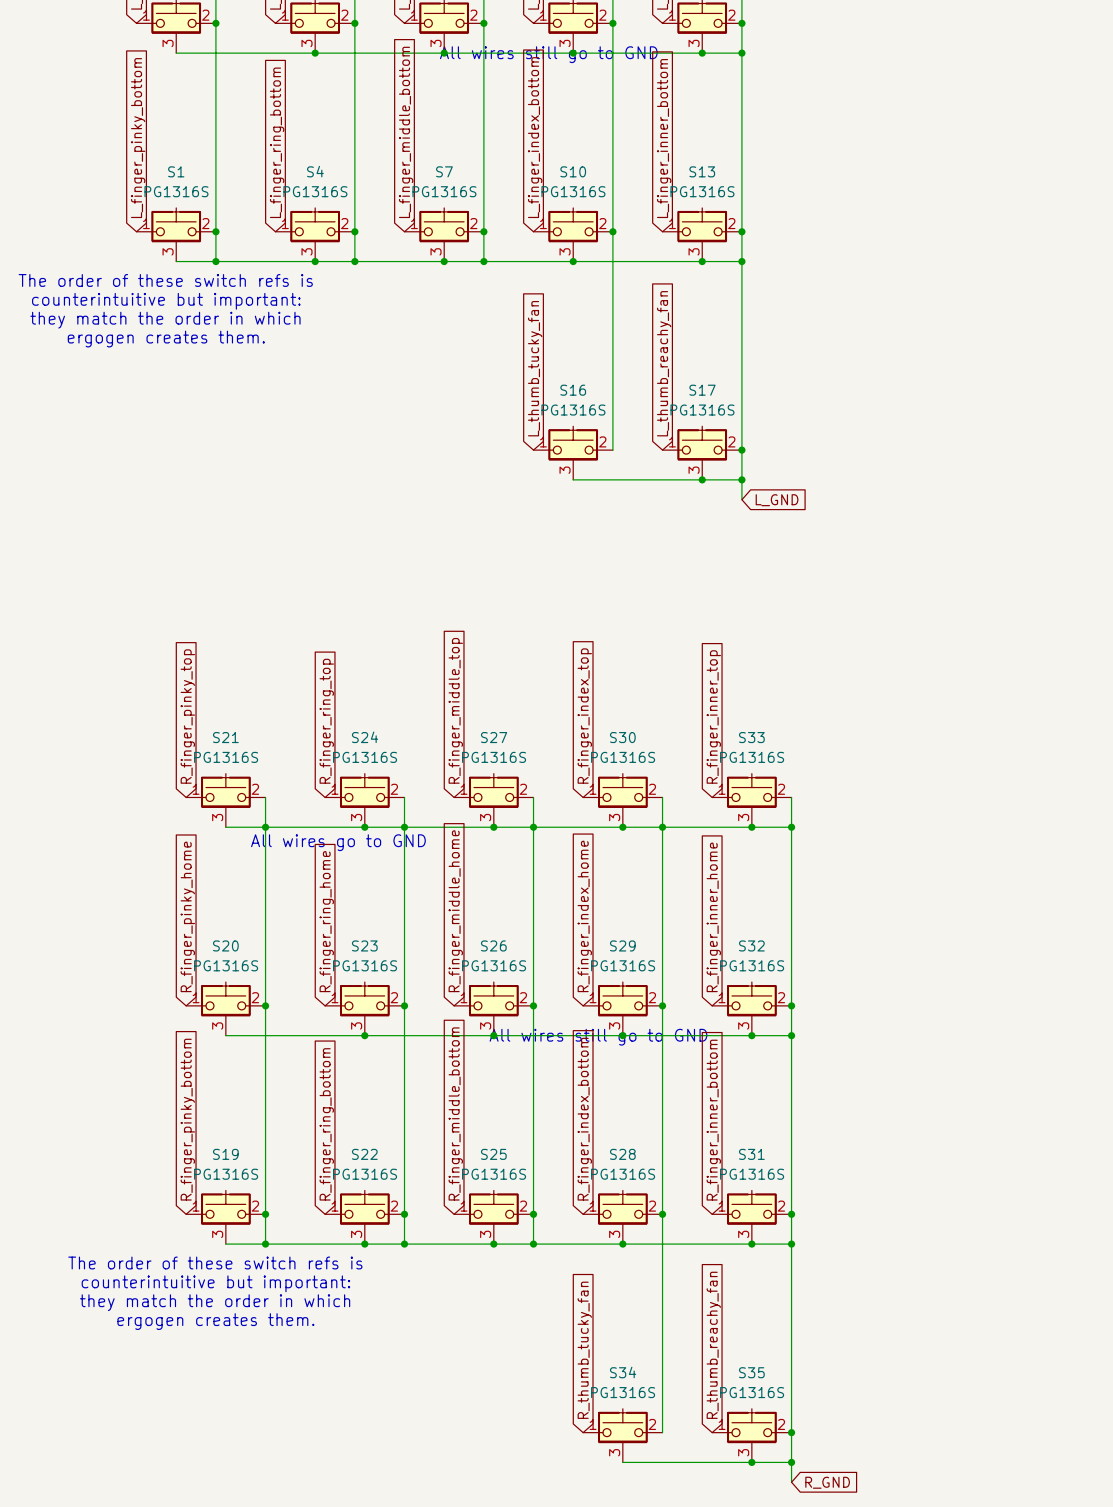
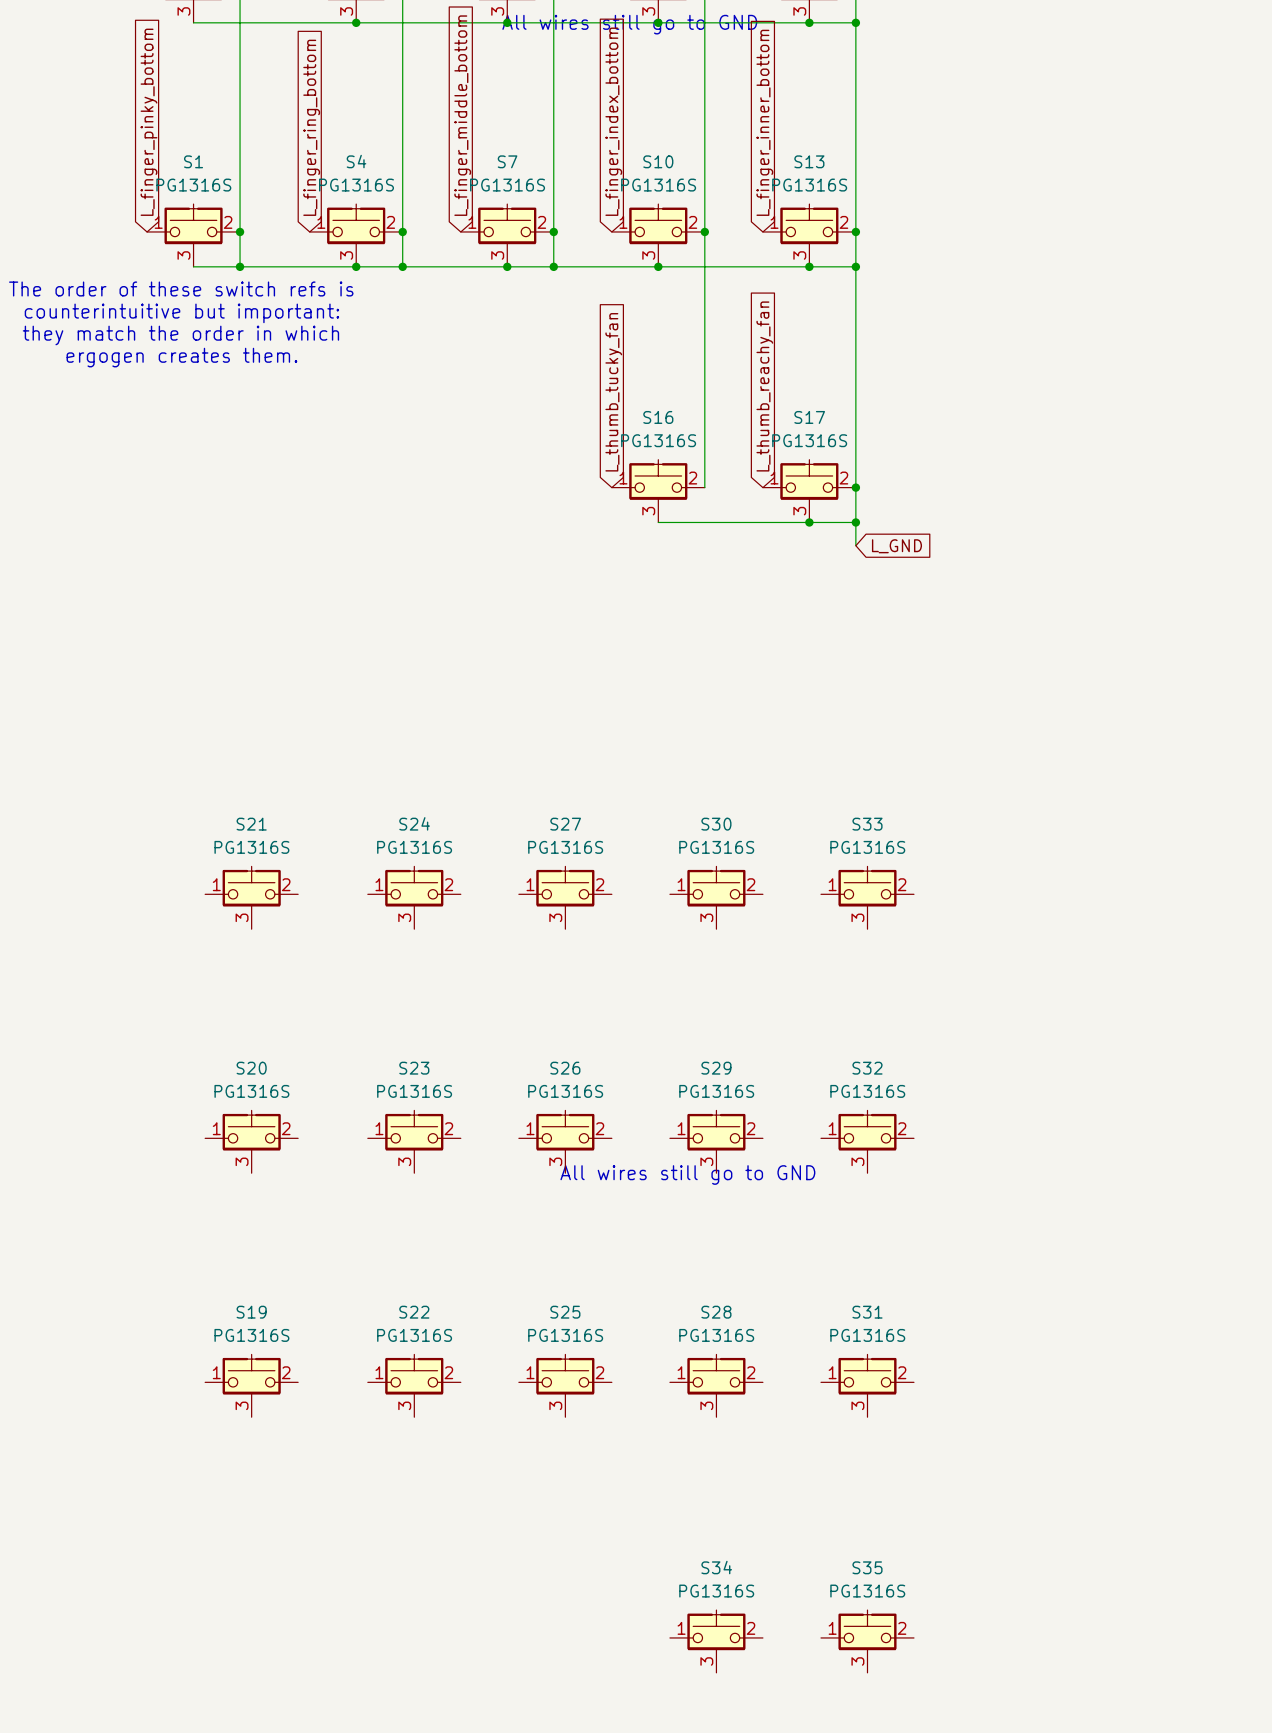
global label: R_finger_middle_top (455, 710) -> none
global label: R_finger_pinky_top (187, 716) -> none
global label: R_finger_index_top (584, 716) -> none
global label: R_finger_inner_top (713, 716) -> none
global label: R_finger_ring_top (326, 721) -> none
wire: (265, 797) (265, 1244) -> none
wire: (404, 797) (404, 1244) -> none
wire: (533, 797) (533, 1244) -> none
wire: (662, 797) (662, 1432) -> none
wire: (791, 797) (791, 1482) -> none
wire: (225, 827) (791, 827) -> none
junction: (265, 827) -> none
junction: (364, 827) -> none
junction: (404, 827) -> none
junction: (493, 827) -> none
junction: (533, 827) -> none
junction: (622, 827) -> none
junction: (662, 827) -> none
junction: (751, 827) -> none
junction: (791, 827) -> none
text: All wires go to GND (338, 842) -> none
global label: R_finger_middle_home (455, 911) -> none
global label: R_finger_pinky_home (187, 916) -> none
global label: R_finger_index_home (584, 916) -> none
global label: R_finger_inner_home (713, 917) -> none
global label: R_finger_ring_home (326, 921) -> none
junction: (265, 1005) -> none
junction: (404, 1005) -> none
junction: (533, 1005) -> none
junction: (662, 1005) -> none
junction: (791, 1005) -> none
wire: (225, 1035) (791, 1035) -> none
junction: (364, 1035) -> none
junction: (493, 1035) -> none
junction: (622, 1035) -> none
junction: (751, 1035) -> none
junction: (791, 1035) -> none
global label: R_finger_middle_bottom (455, 1113) -> none
global label: R_finger_pinky_bottom (187, 1119) -> none
global label: R_finger_index_bottom (584, 1119) -> none
global label: R_finger_inner_bottom (713, 1120) -> none
global label: R_finger_ring_bottom (326, 1124) -> none
junction: (265, 1214) -> none
junction: (404, 1214) -> none
junction: (533, 1214) -> none
junction: (662, 1214) -> none
junction: (791, 1214) -> none
wire: (225, 1244) (791, 1244) -> none
junction: (265, 1244) -> none
junction: (364, 1244) -> none
junction: (404, 1244) -> none
junction: (493, 1244) -> none
junction: (533, 1244) -> none
junction: (622, 1244) -> none
junction: (751, 1244) -> none
junction: (791, 1244) -> none
text: The order of these switch refs is (215, 1262) -> none
text: counterintuitive but important: (215, 1283) -> none
text: they match the order in which (215, 1302) -> none
text: ergogen creates them. (215, 1321) -> none
global label: R_thumb_reachy_fan (713, 1345) -> none
global label: R_thumb_tucky_fan (584, 1350) -> none
junction: (791, 1432) -> none
wire: (622, 1462) (791, 1462) -> none
junction: (751, 1462) -> none
junction: (791, 1462) -> none
global label: R_GND (827, 1482) -> none

